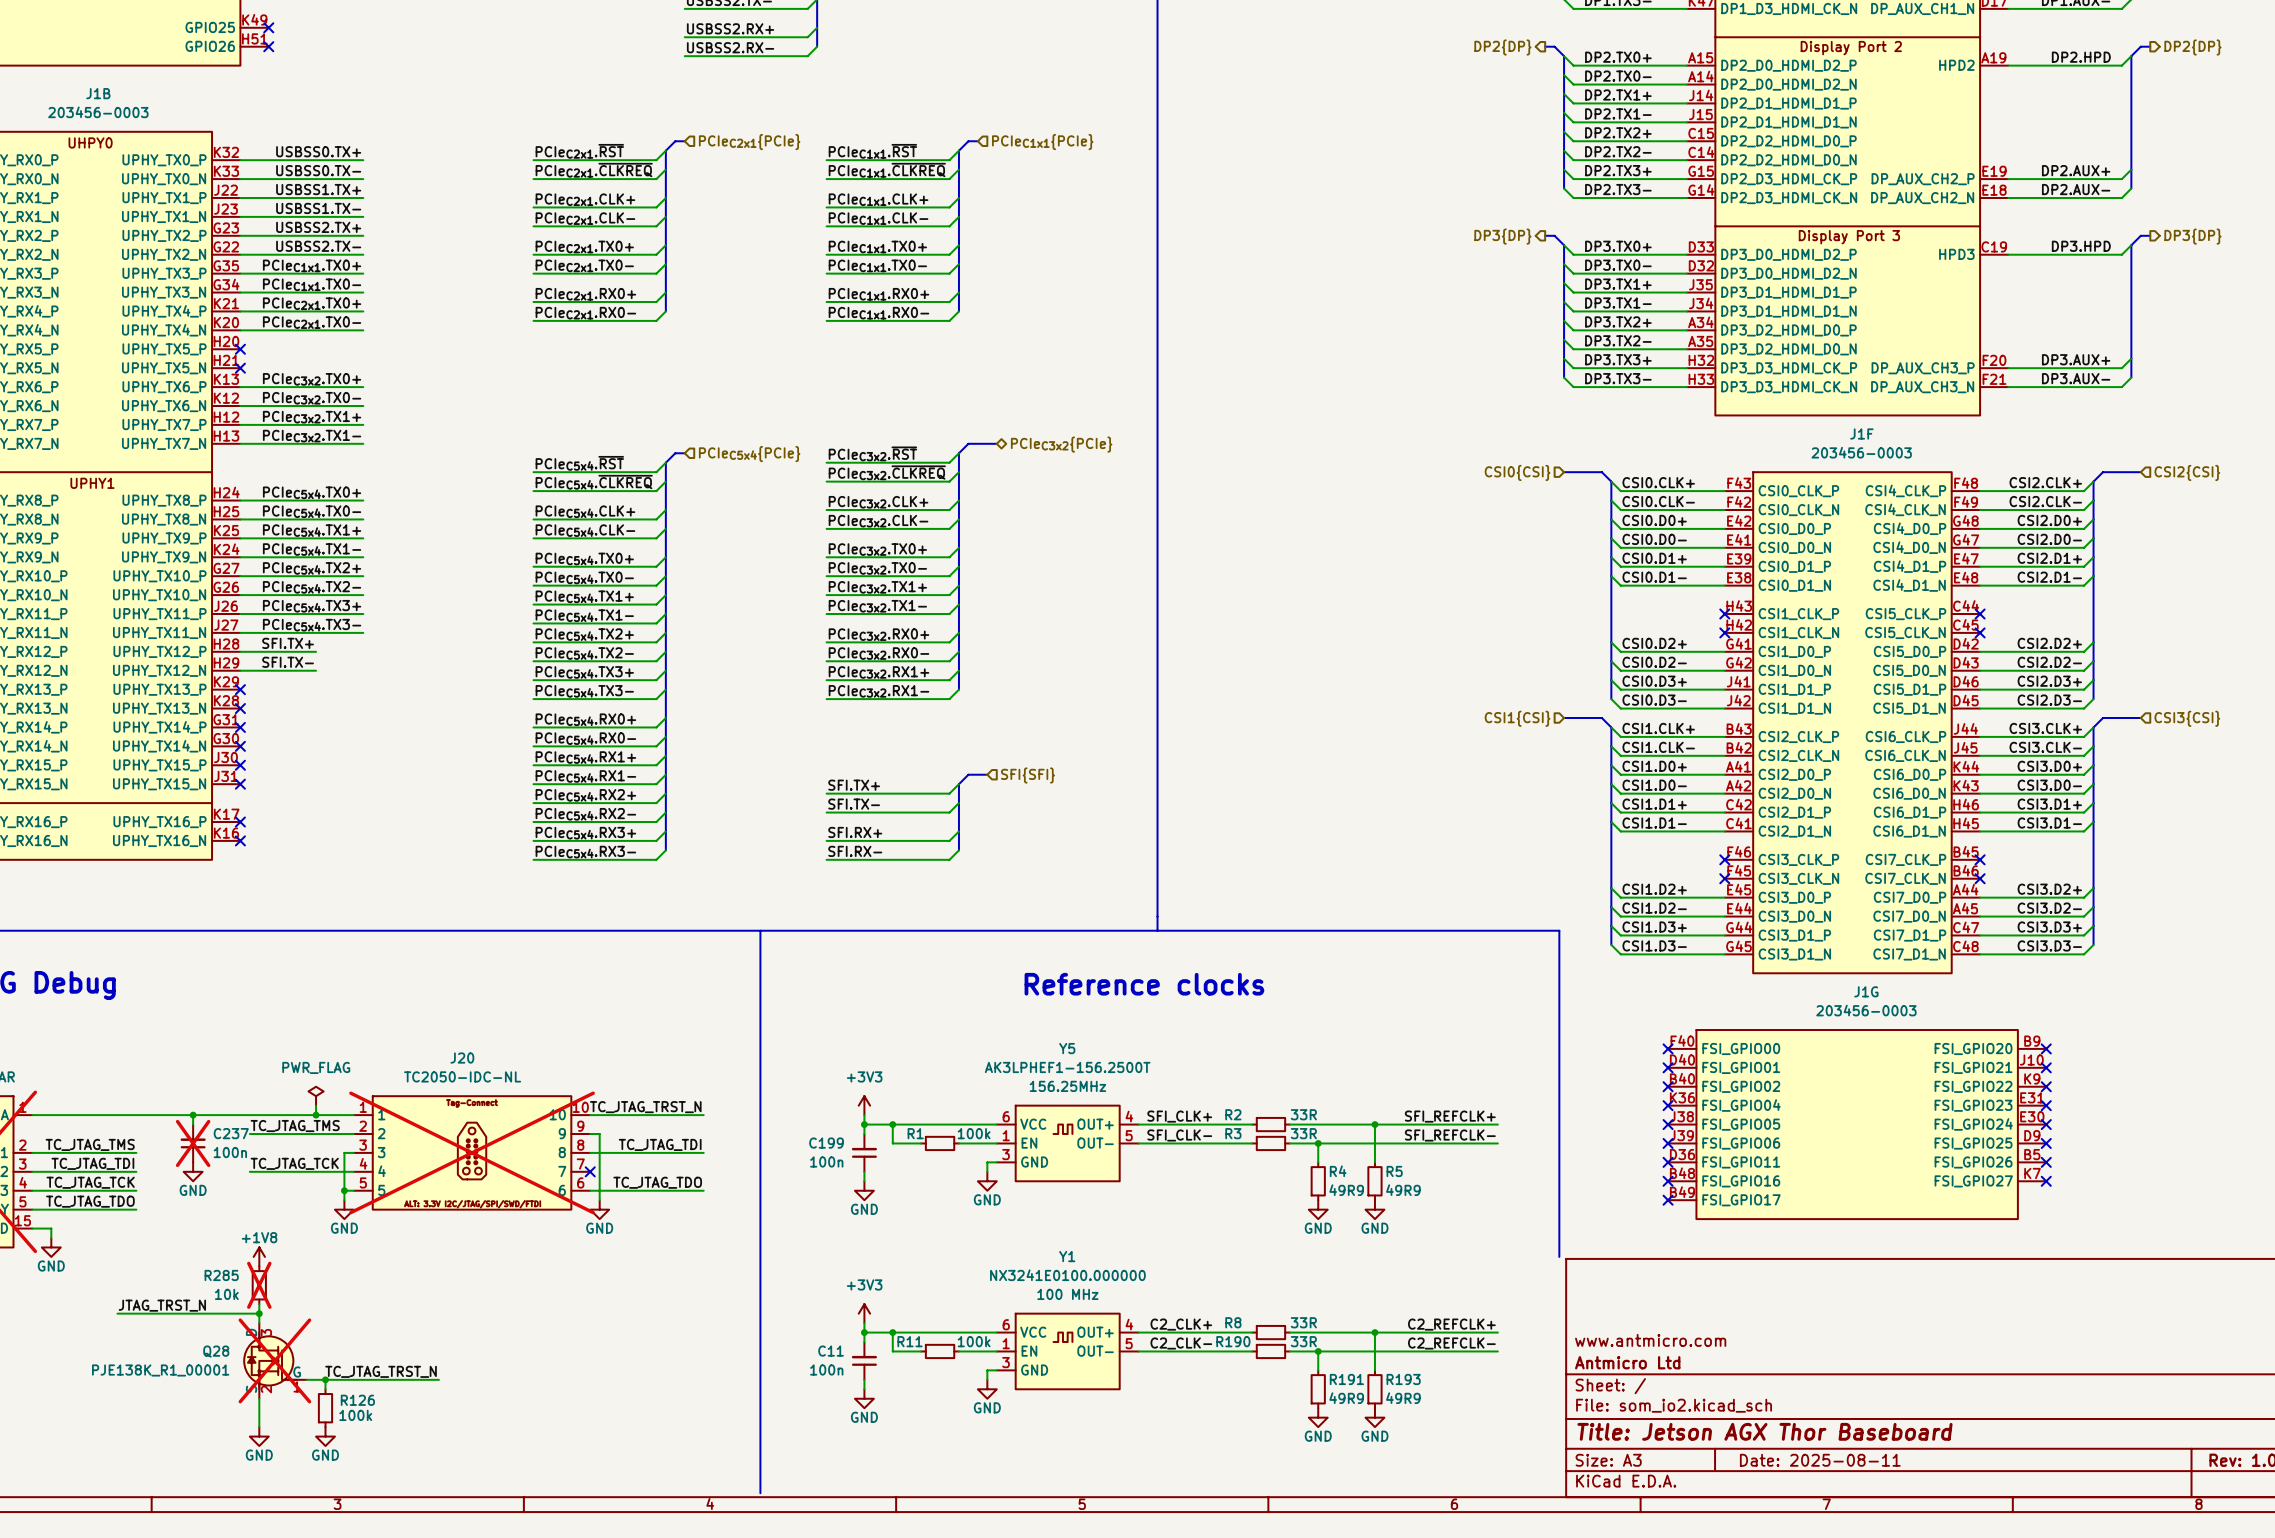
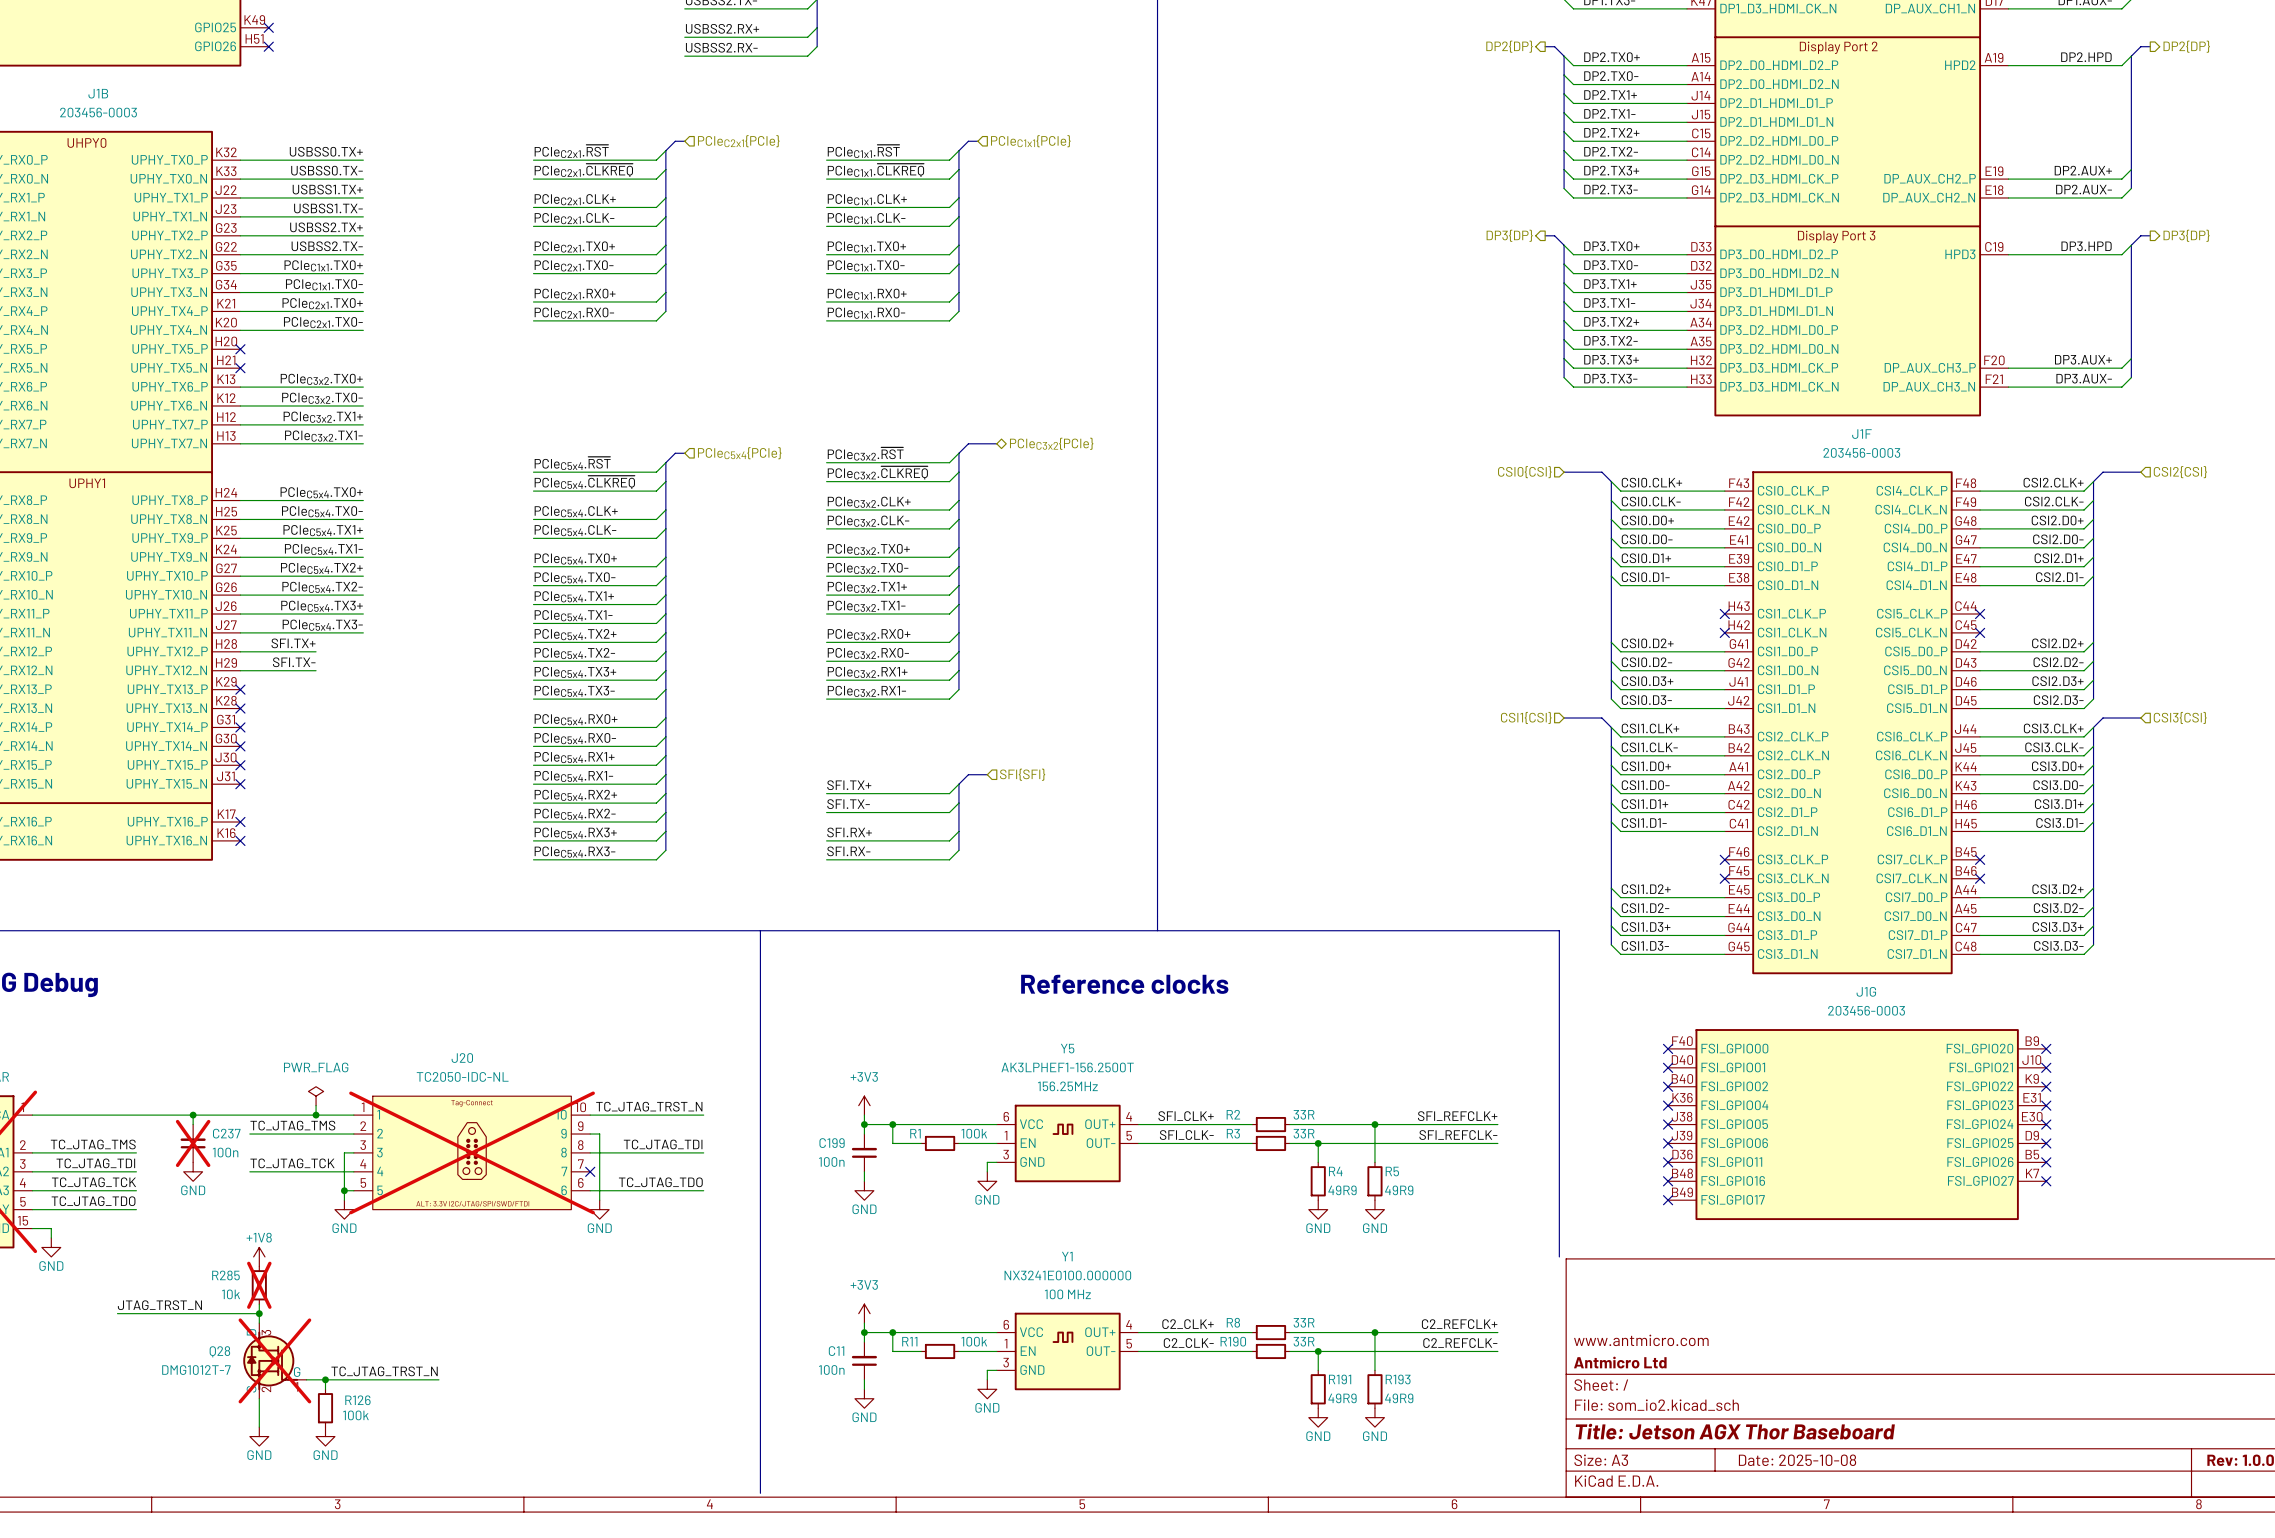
Q28 text: PJE138K_R1_00001 (160, 1370) -> DMG1012T-7 (196, 1370)
title block: Date: 2025-08-11 (1820, 1460) -> Date: 2025-10-08 (1797, 1460)

